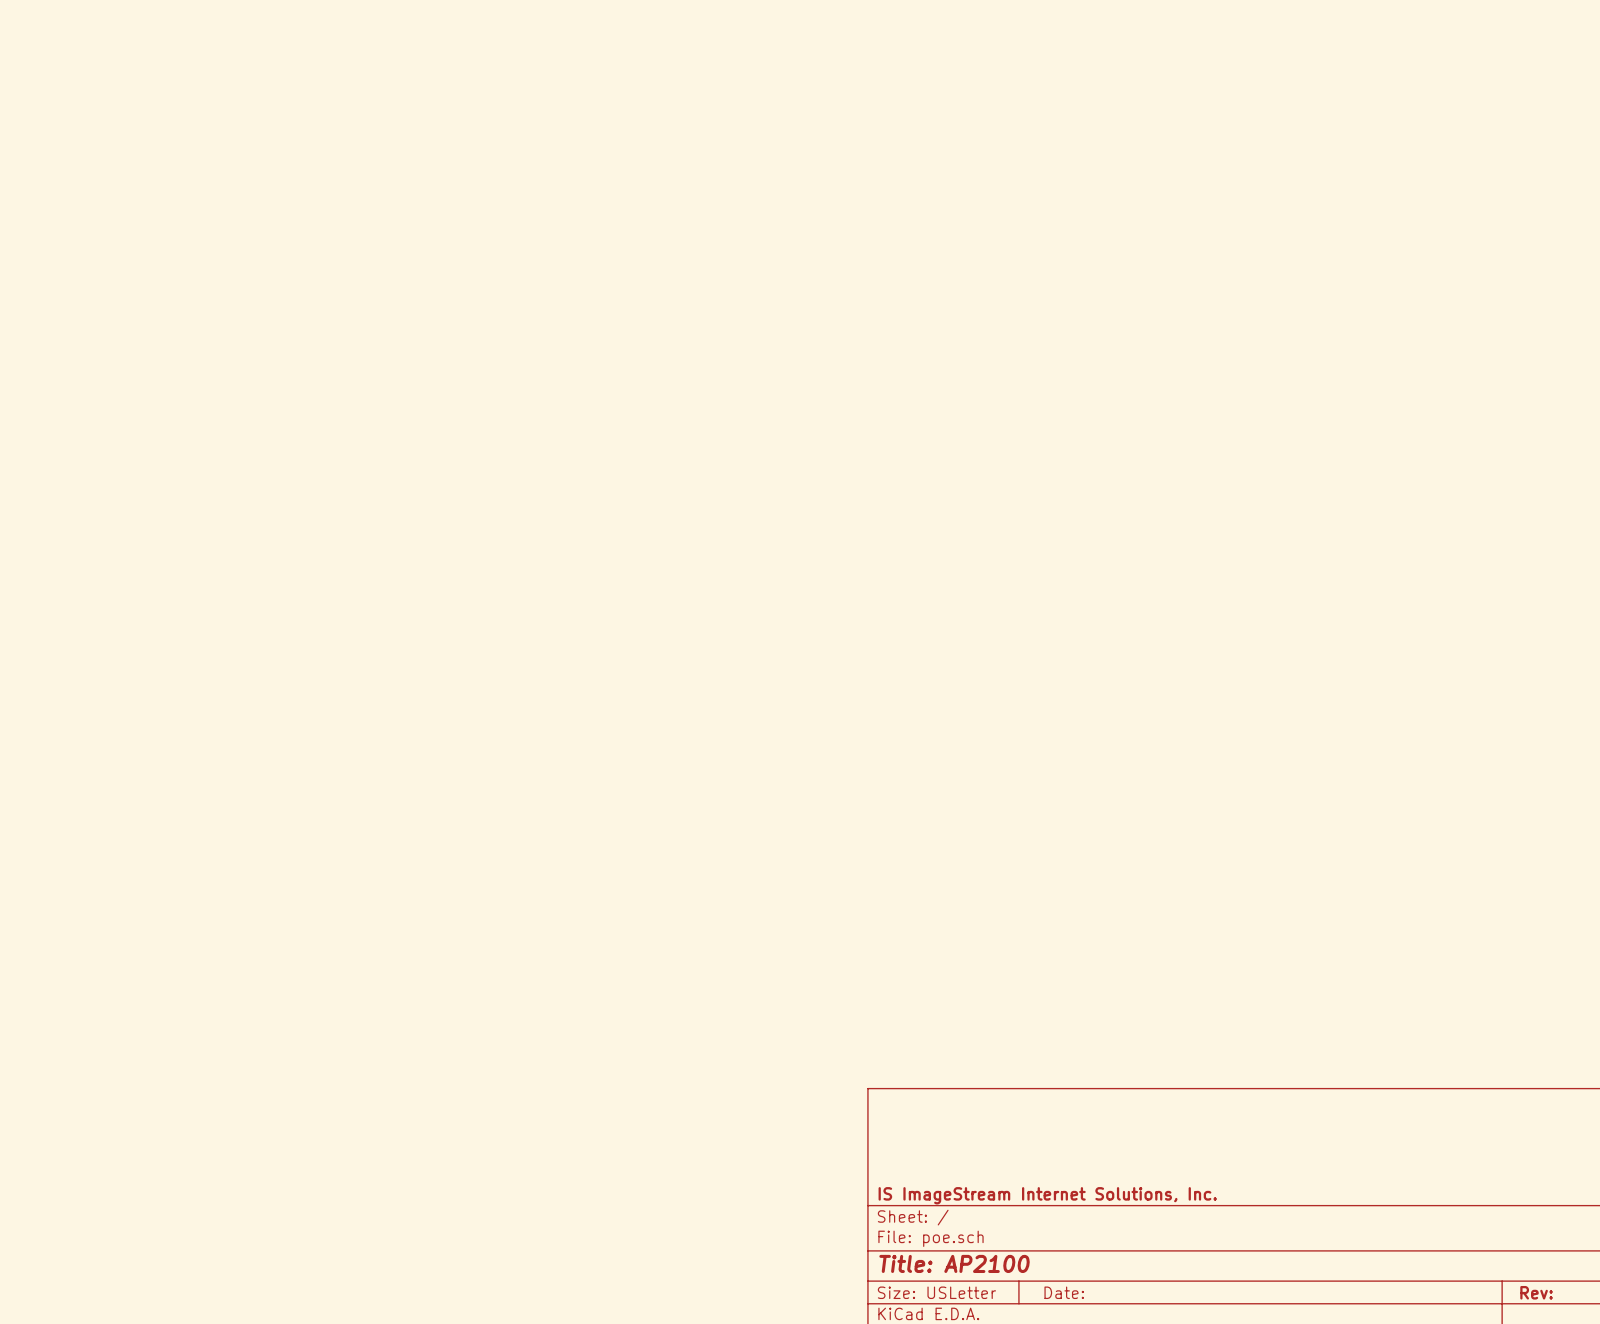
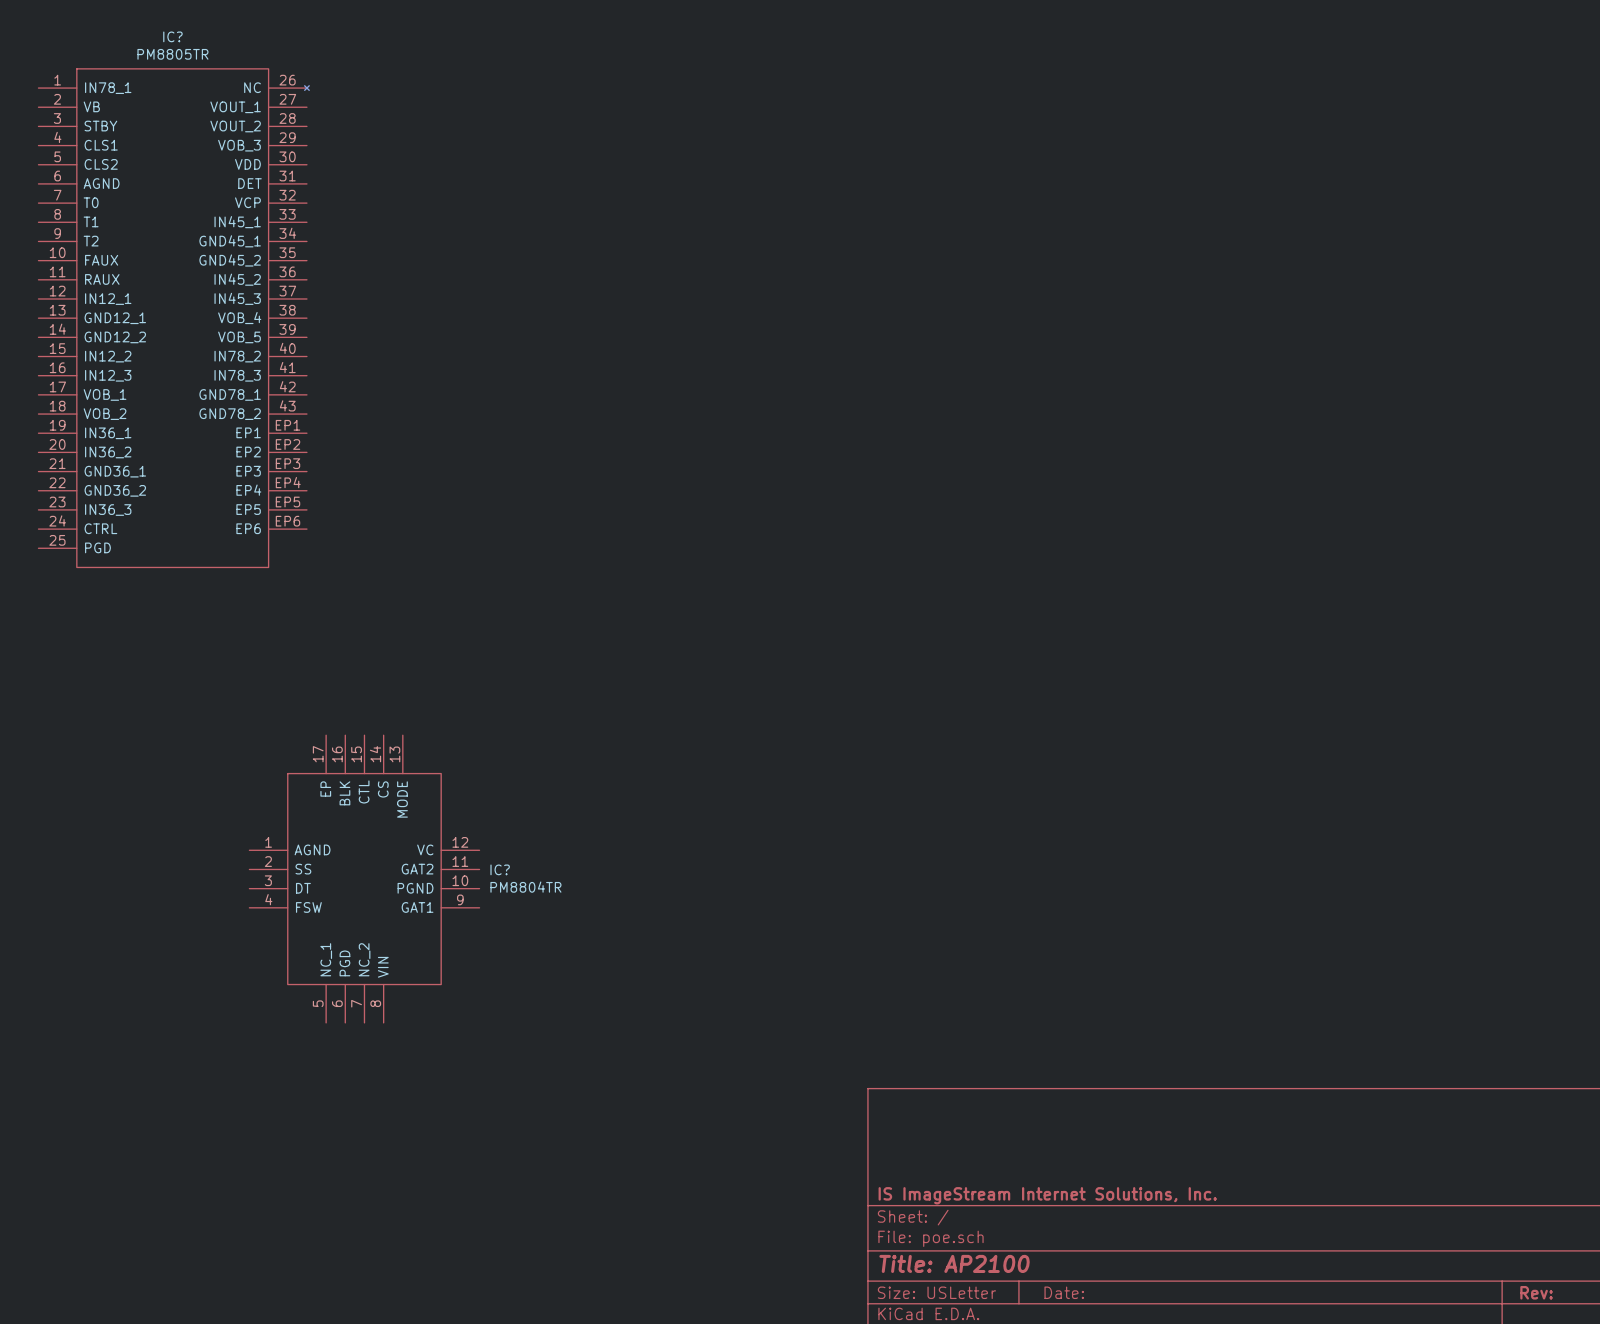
IC?: none -> PM8805TR (173, 318)
IC?: none -> PM8804TR (364, 879)

